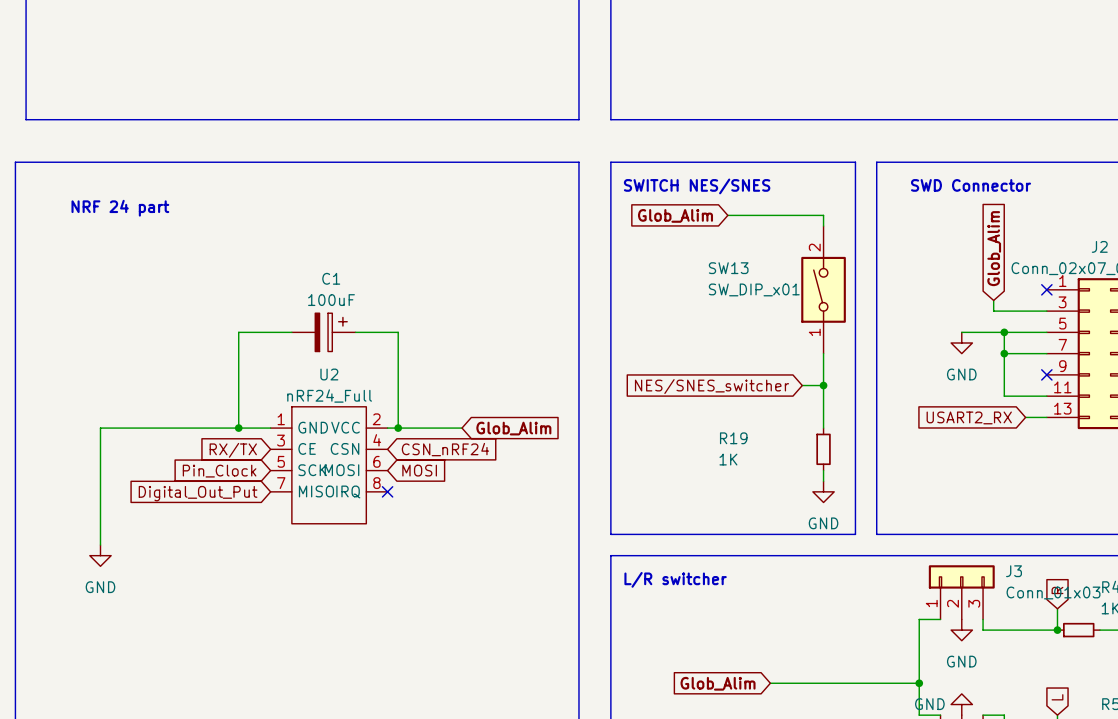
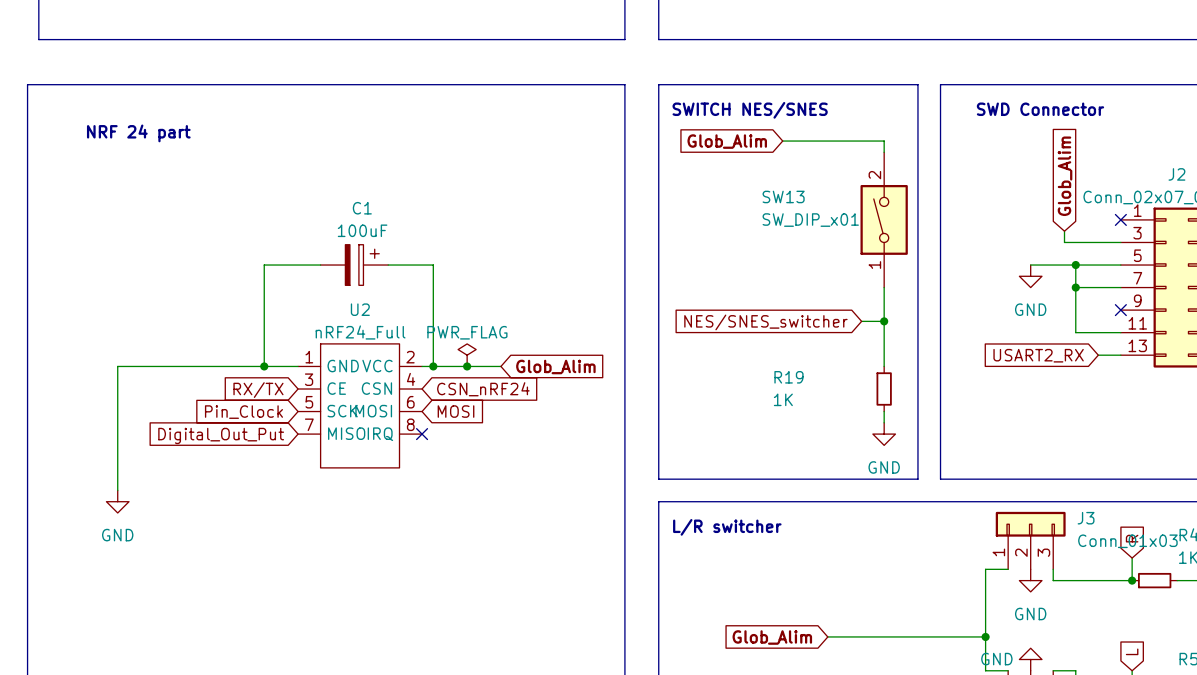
power symbol: none -> PWR_FLAG (467, 355)
junction: none -> (467, 366)

